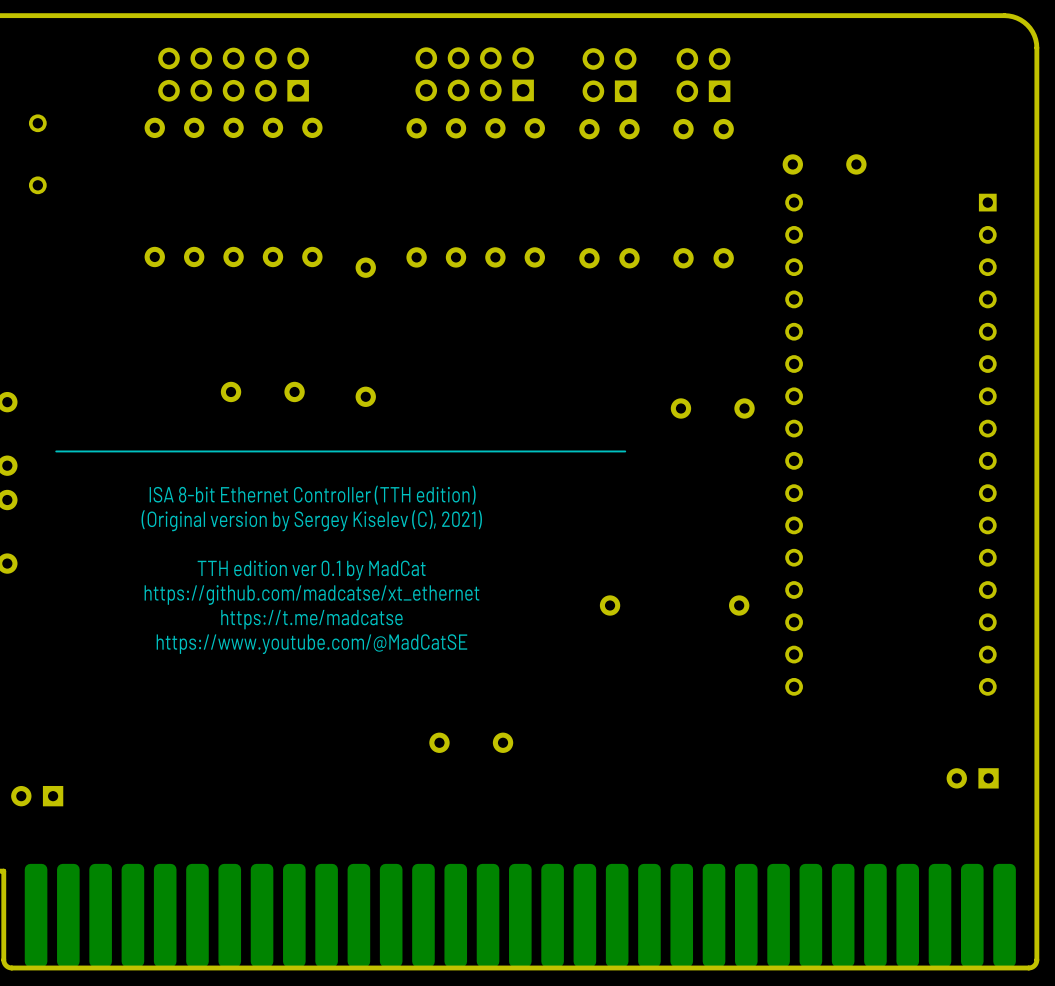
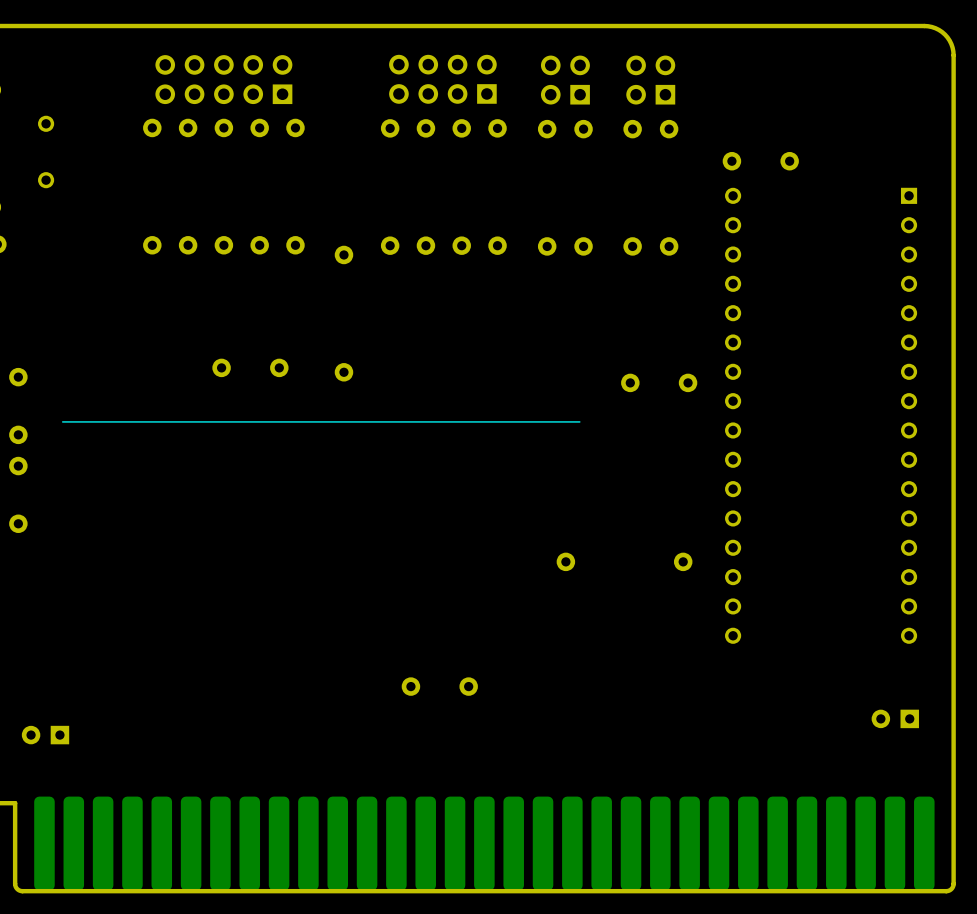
text: ISA 8-bit Ethernet Controller (TTH edition) (312, 495) -> none
text: (Original version by Sergey Kiselev (C), 2021) (311, 520) -> none
text: TTH edition ver 0.1 by MadCat (311, 570) -> none
text: https://github.com/madcatse/xt_ethernet (311, 595) -> none
text: https://t.me/madcatse (311, 619) -> none
text: https://www.youtube.com/@MadCatSE (311, 644) -> none

